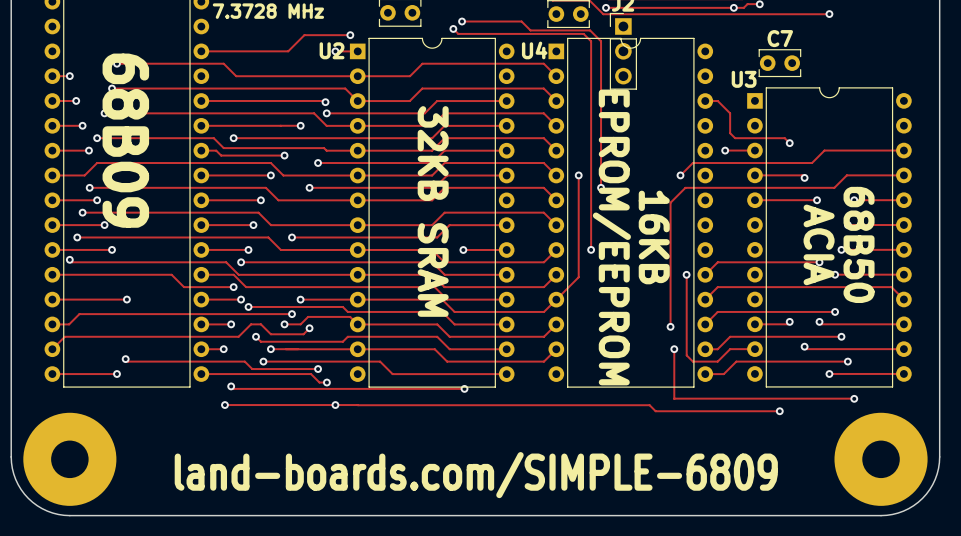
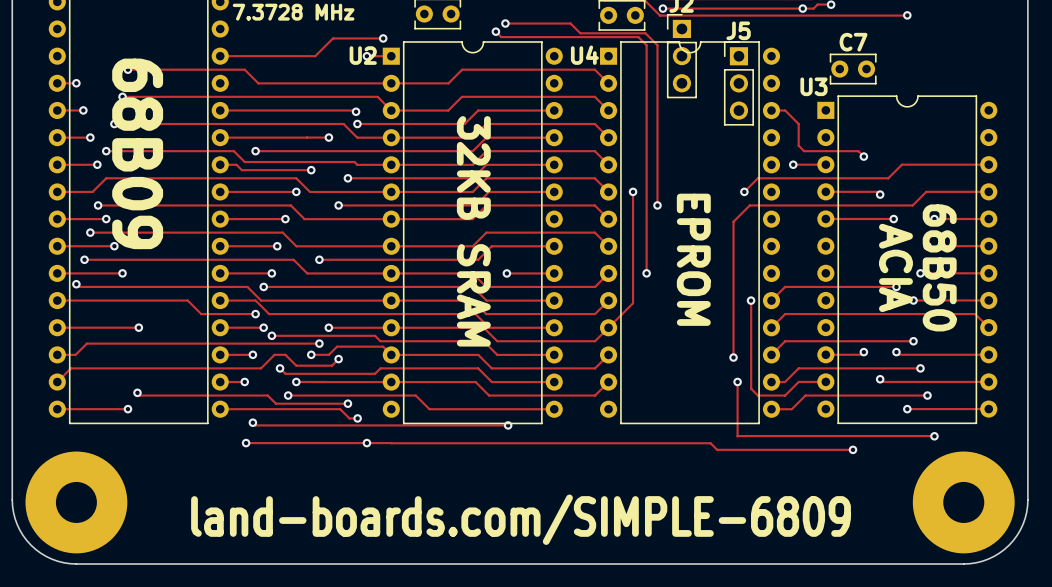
J5: none -> (738, 83)
text: EPROM/EEPROM (611, 237) -> none
text: none -> EPROM (693, 259)
text: 16KB (654, 237) -> none

